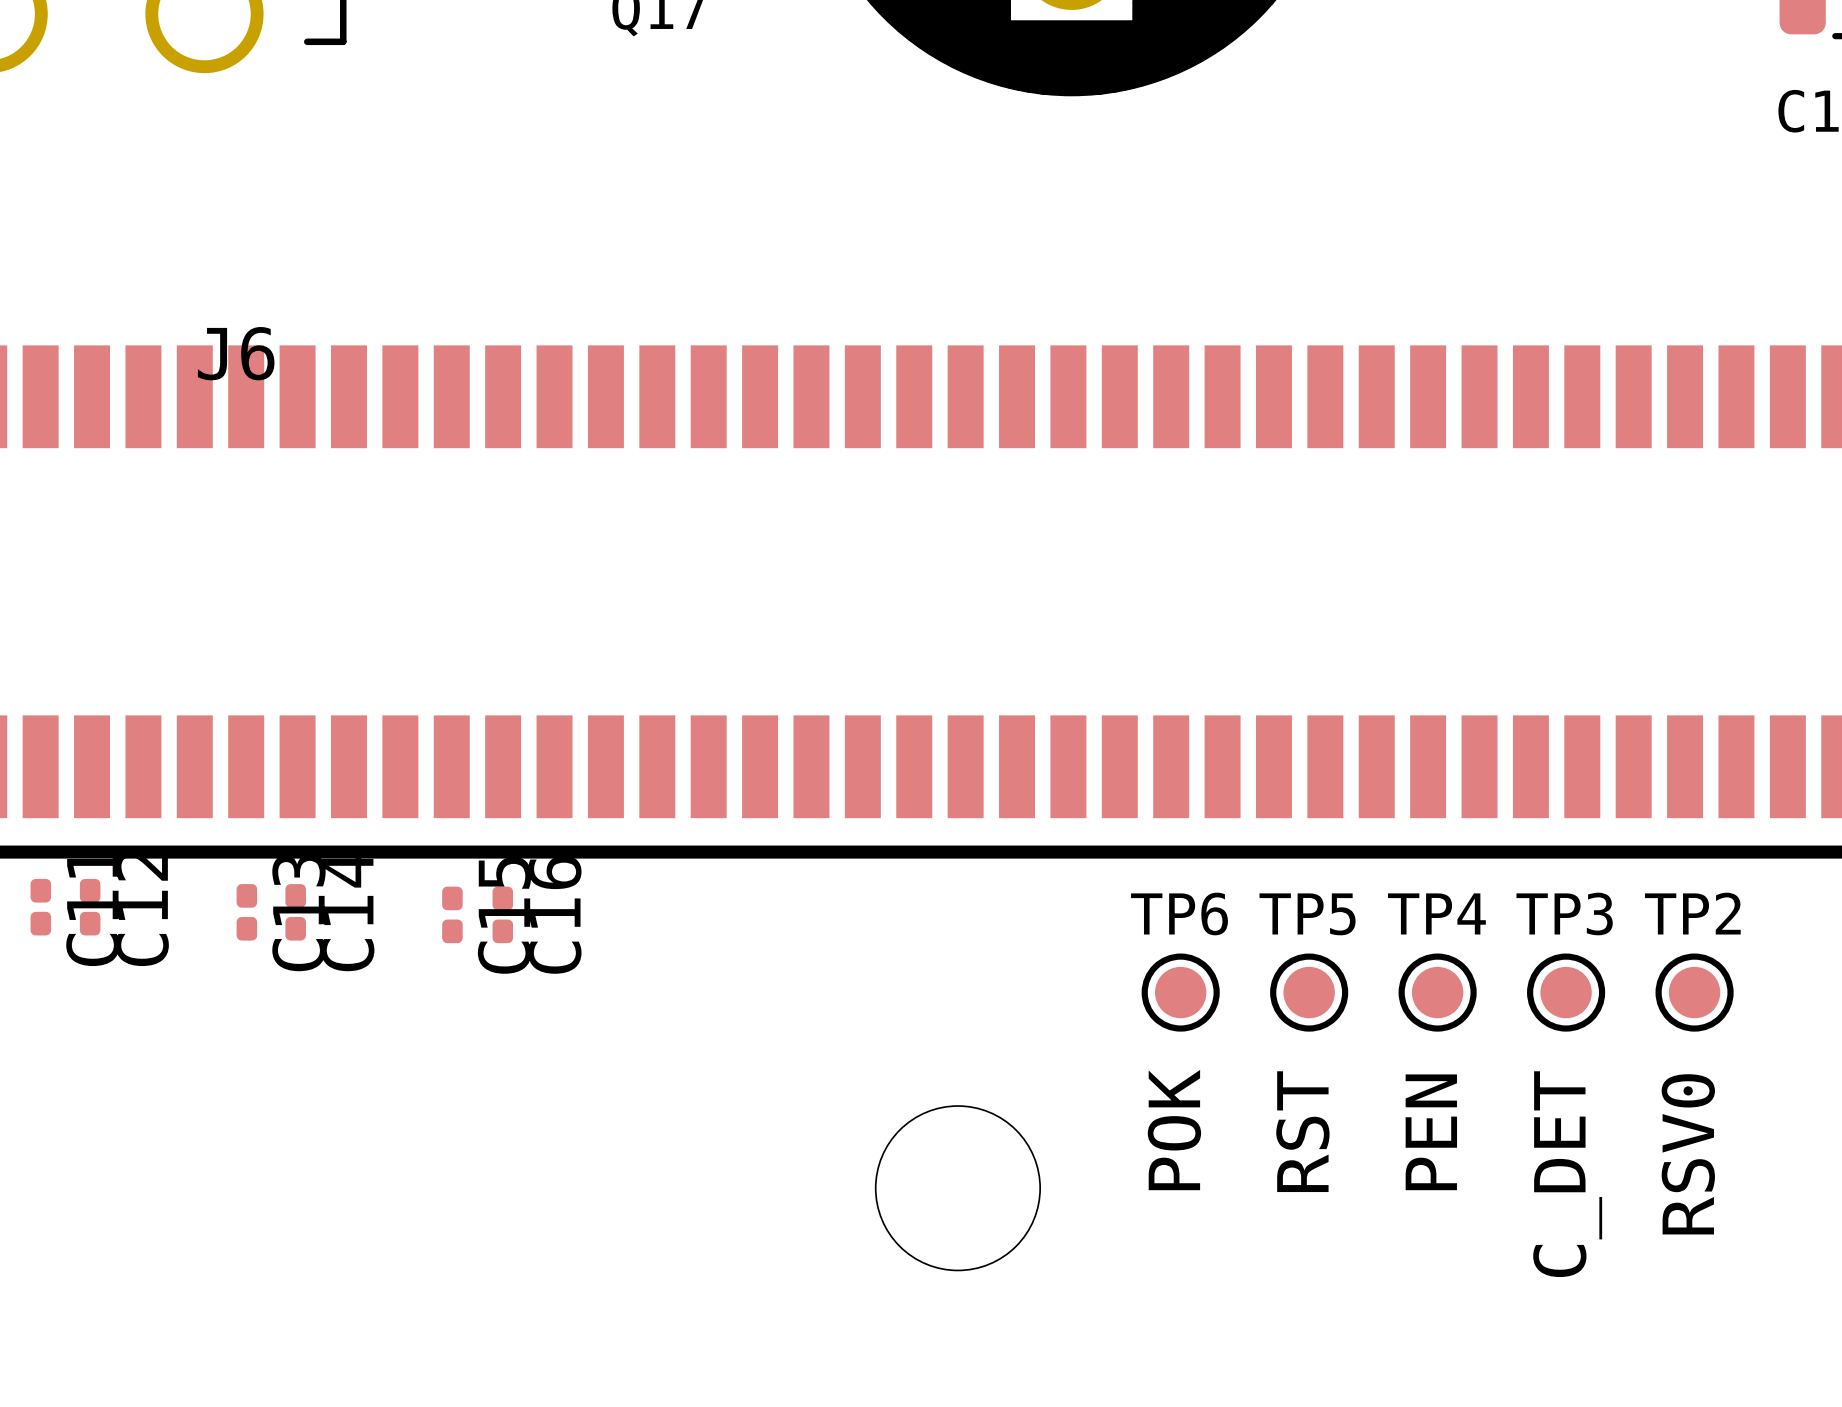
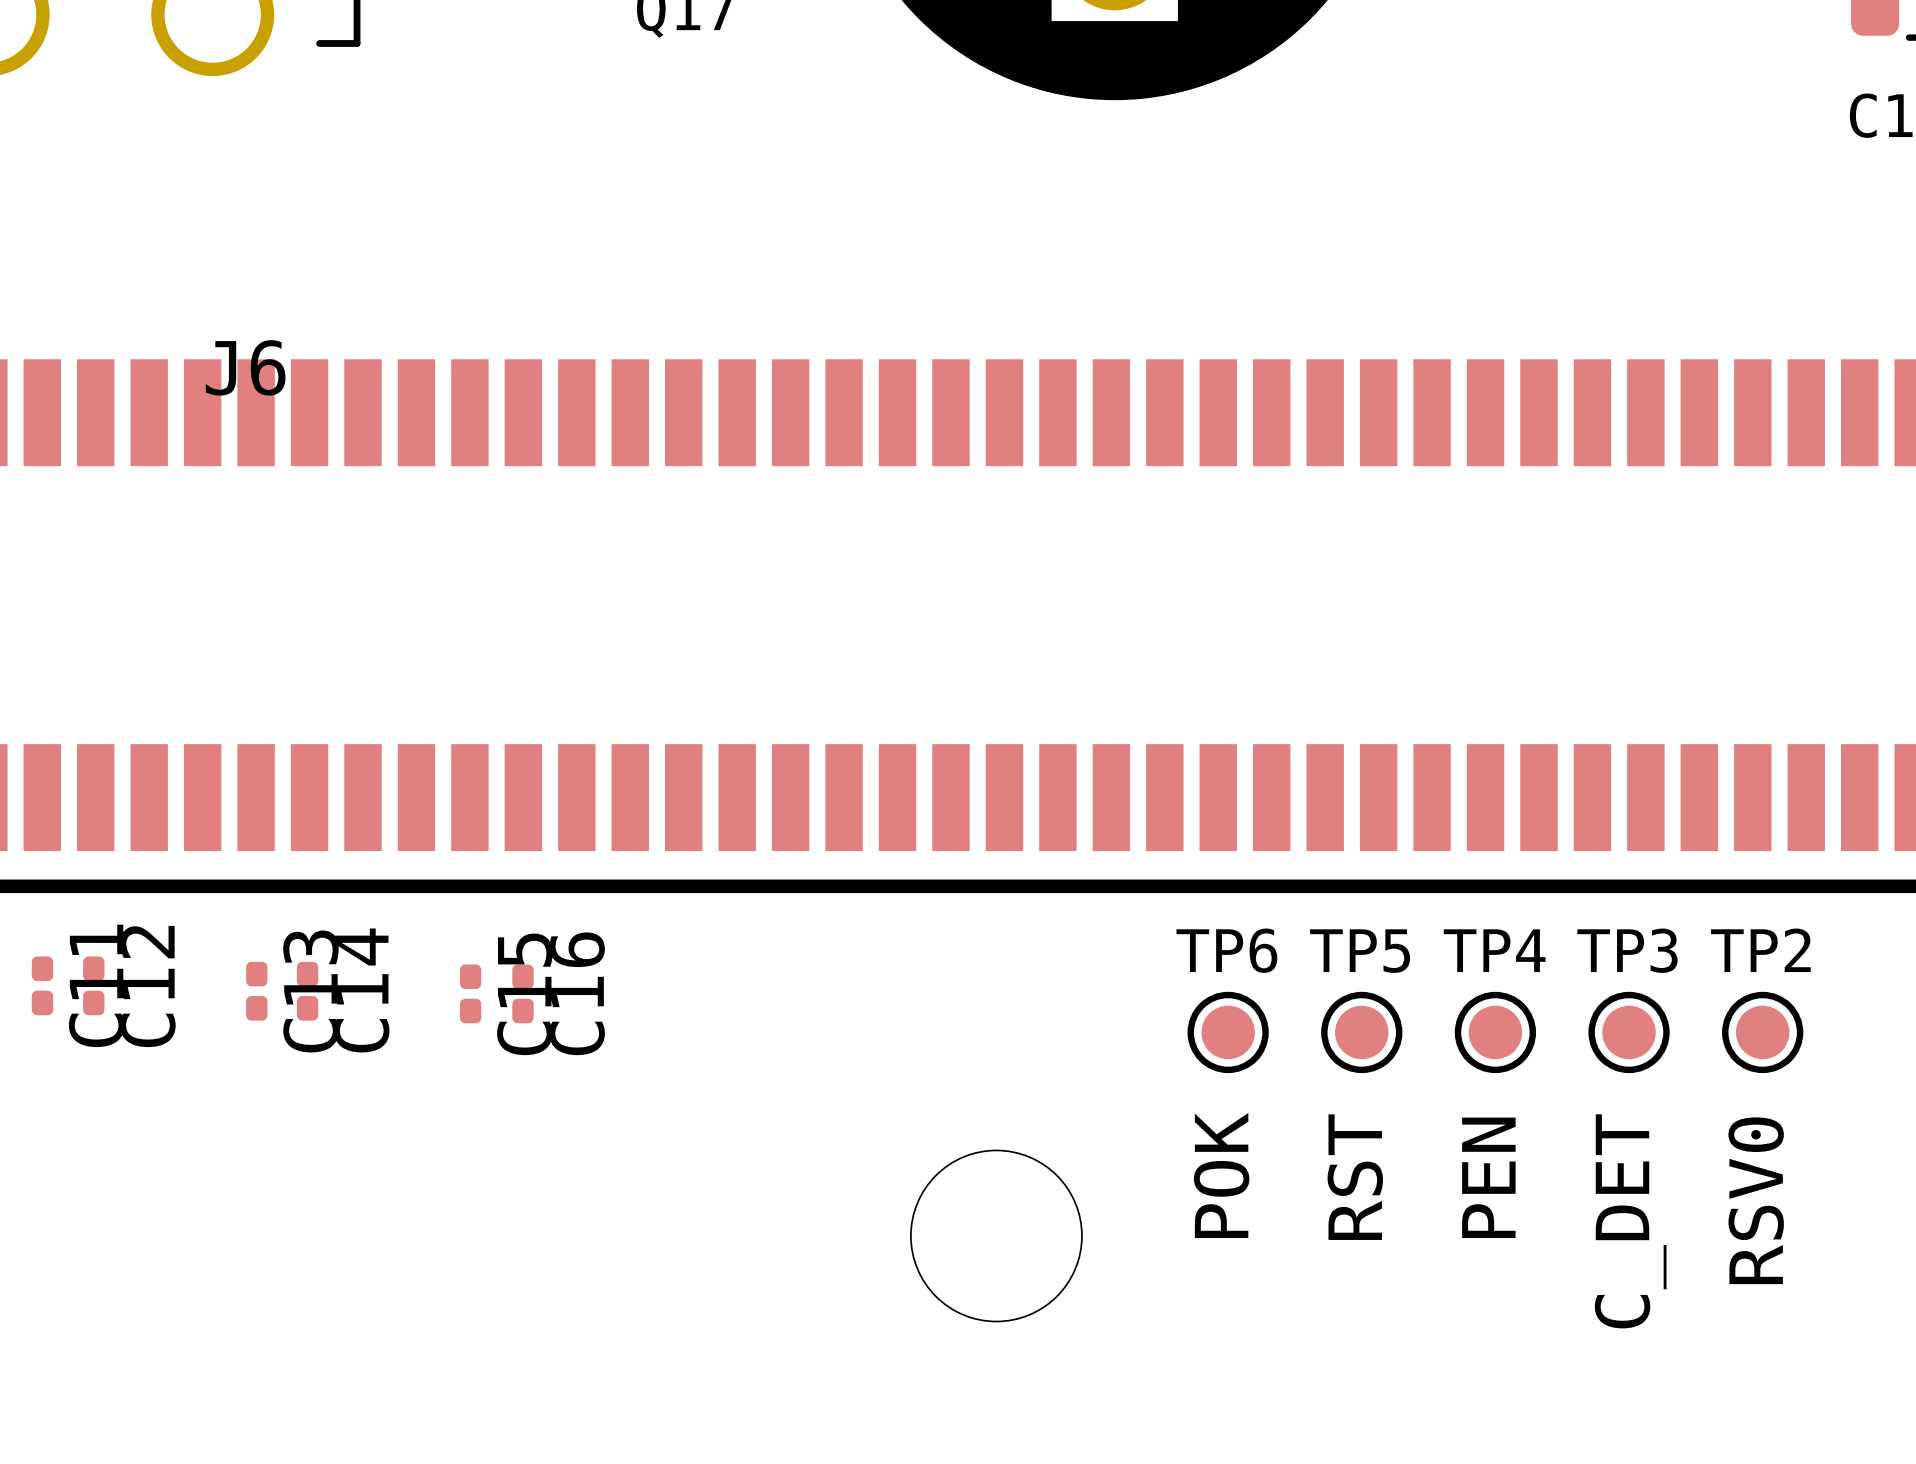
C11 position: (40, 907) -> (42, 985)
C12 position: (90, 907) -> (93, 985)
C13 position: (246, 912) -> (256, 991)
C14 position: (295, 912) -> (307, 991)
C15 position: (452, 914) -> (470, 993)
C16 position: (502, 914) -> (523, 993)

